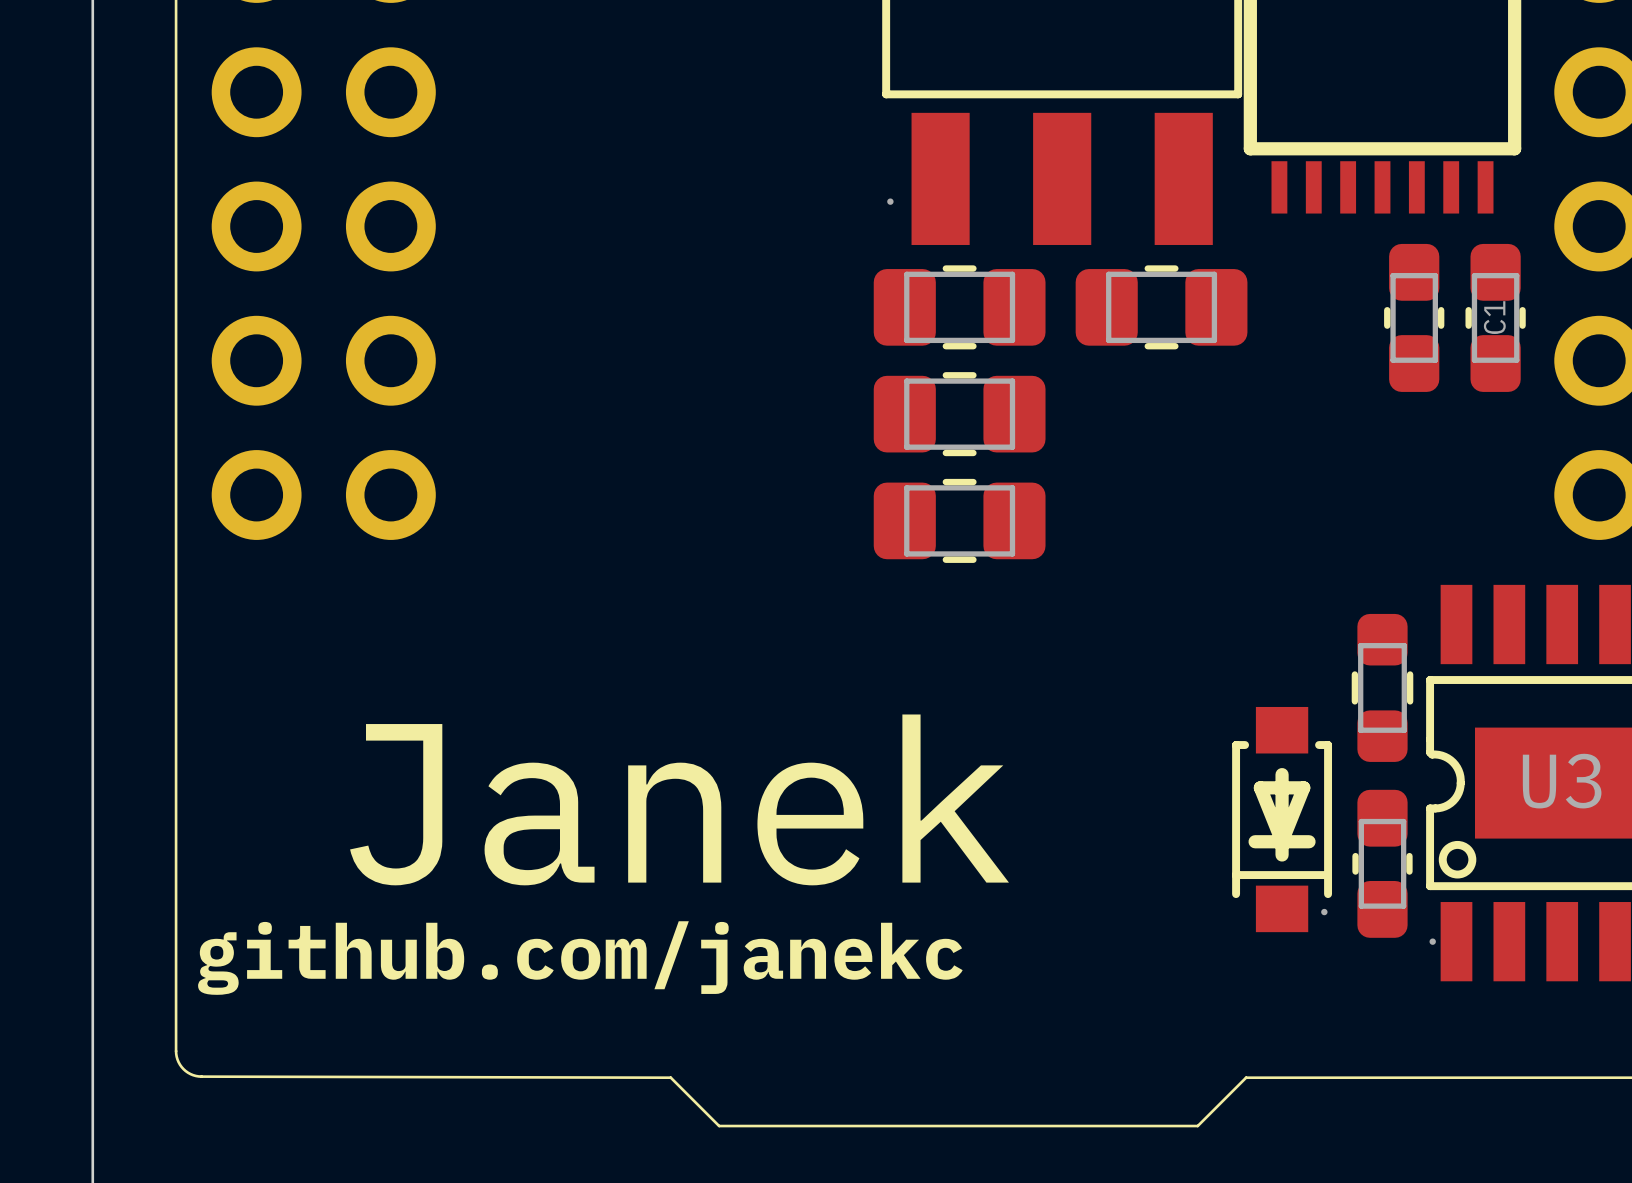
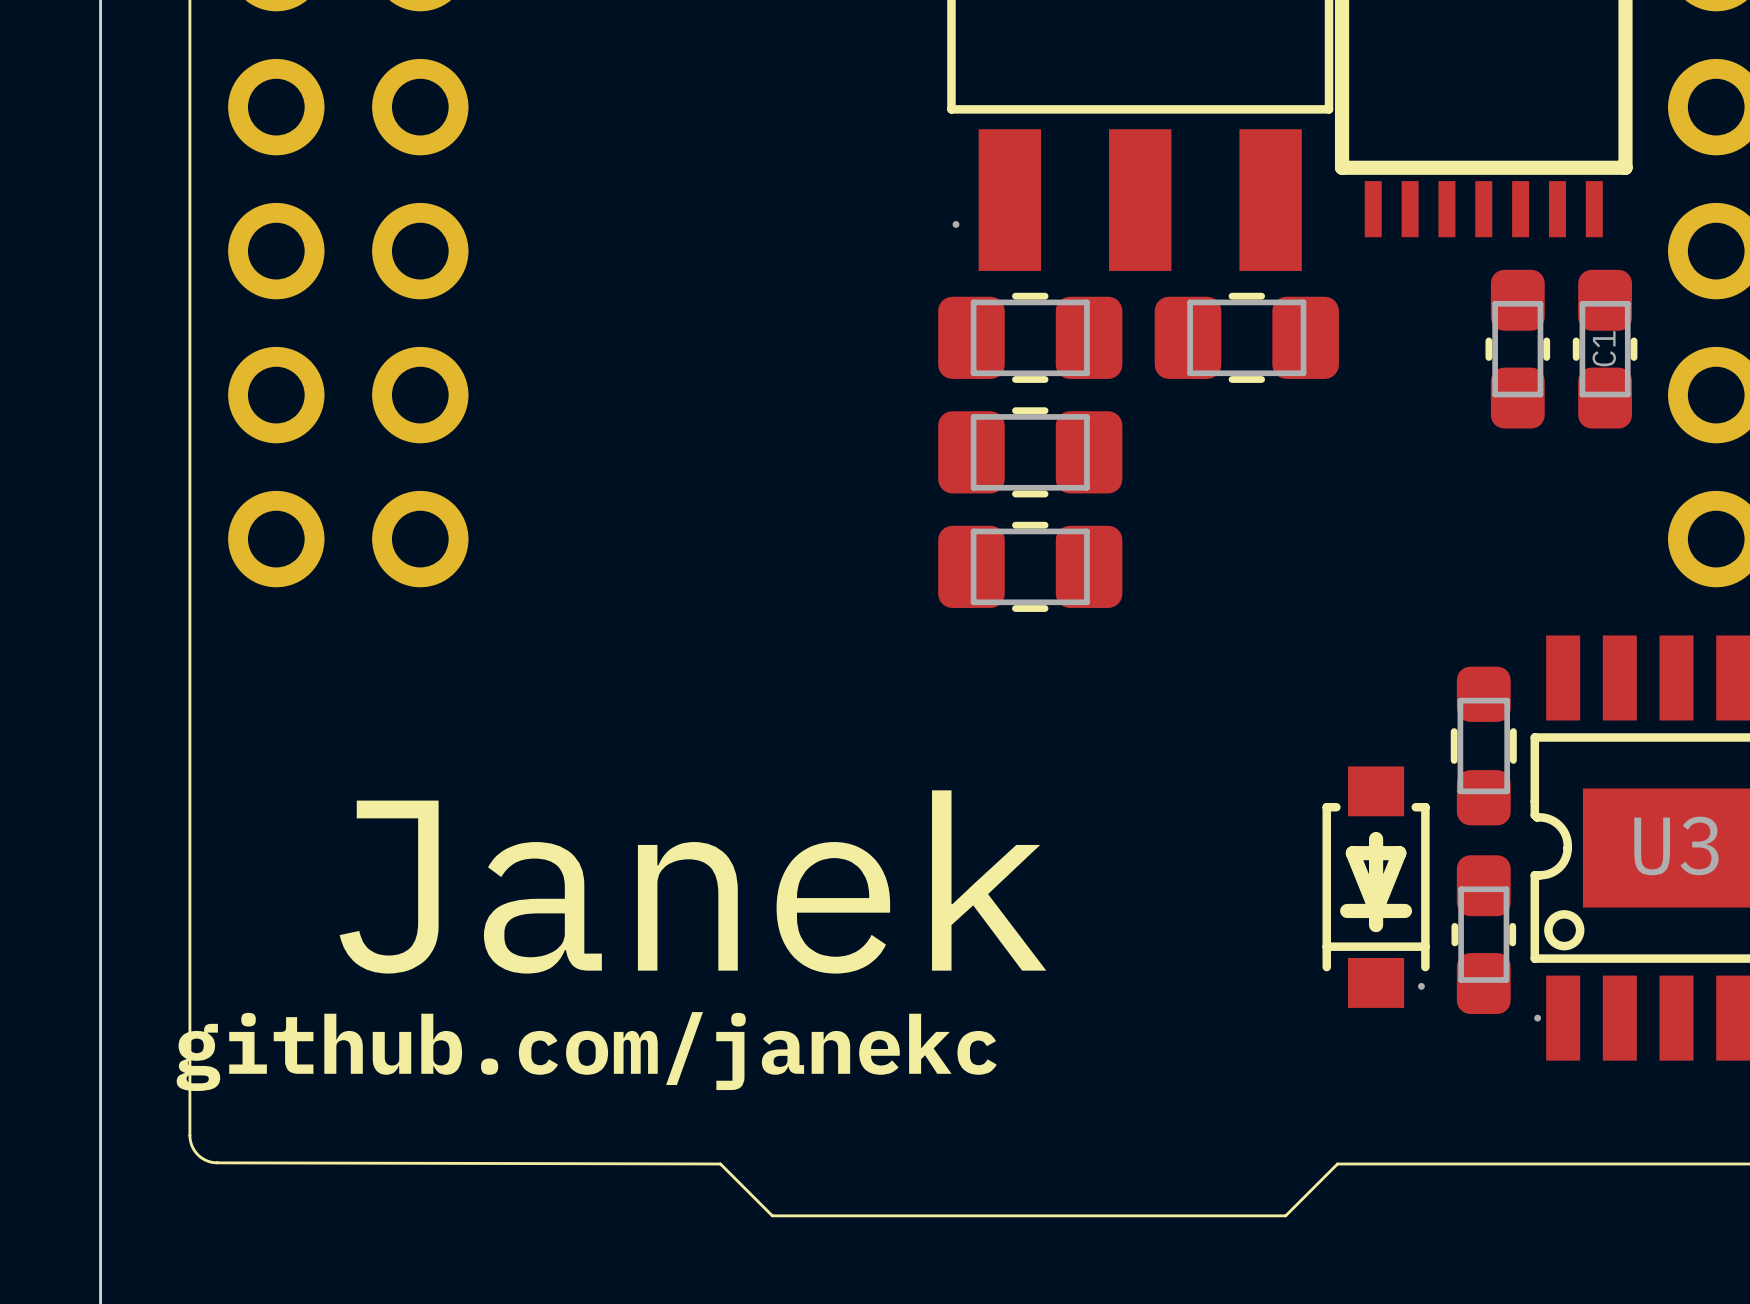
text position: Janek (679, 799) -> Janek (693, 881)
text position: github.com/janekc (580, 958) -> github.com/janekc (586, 1051)

